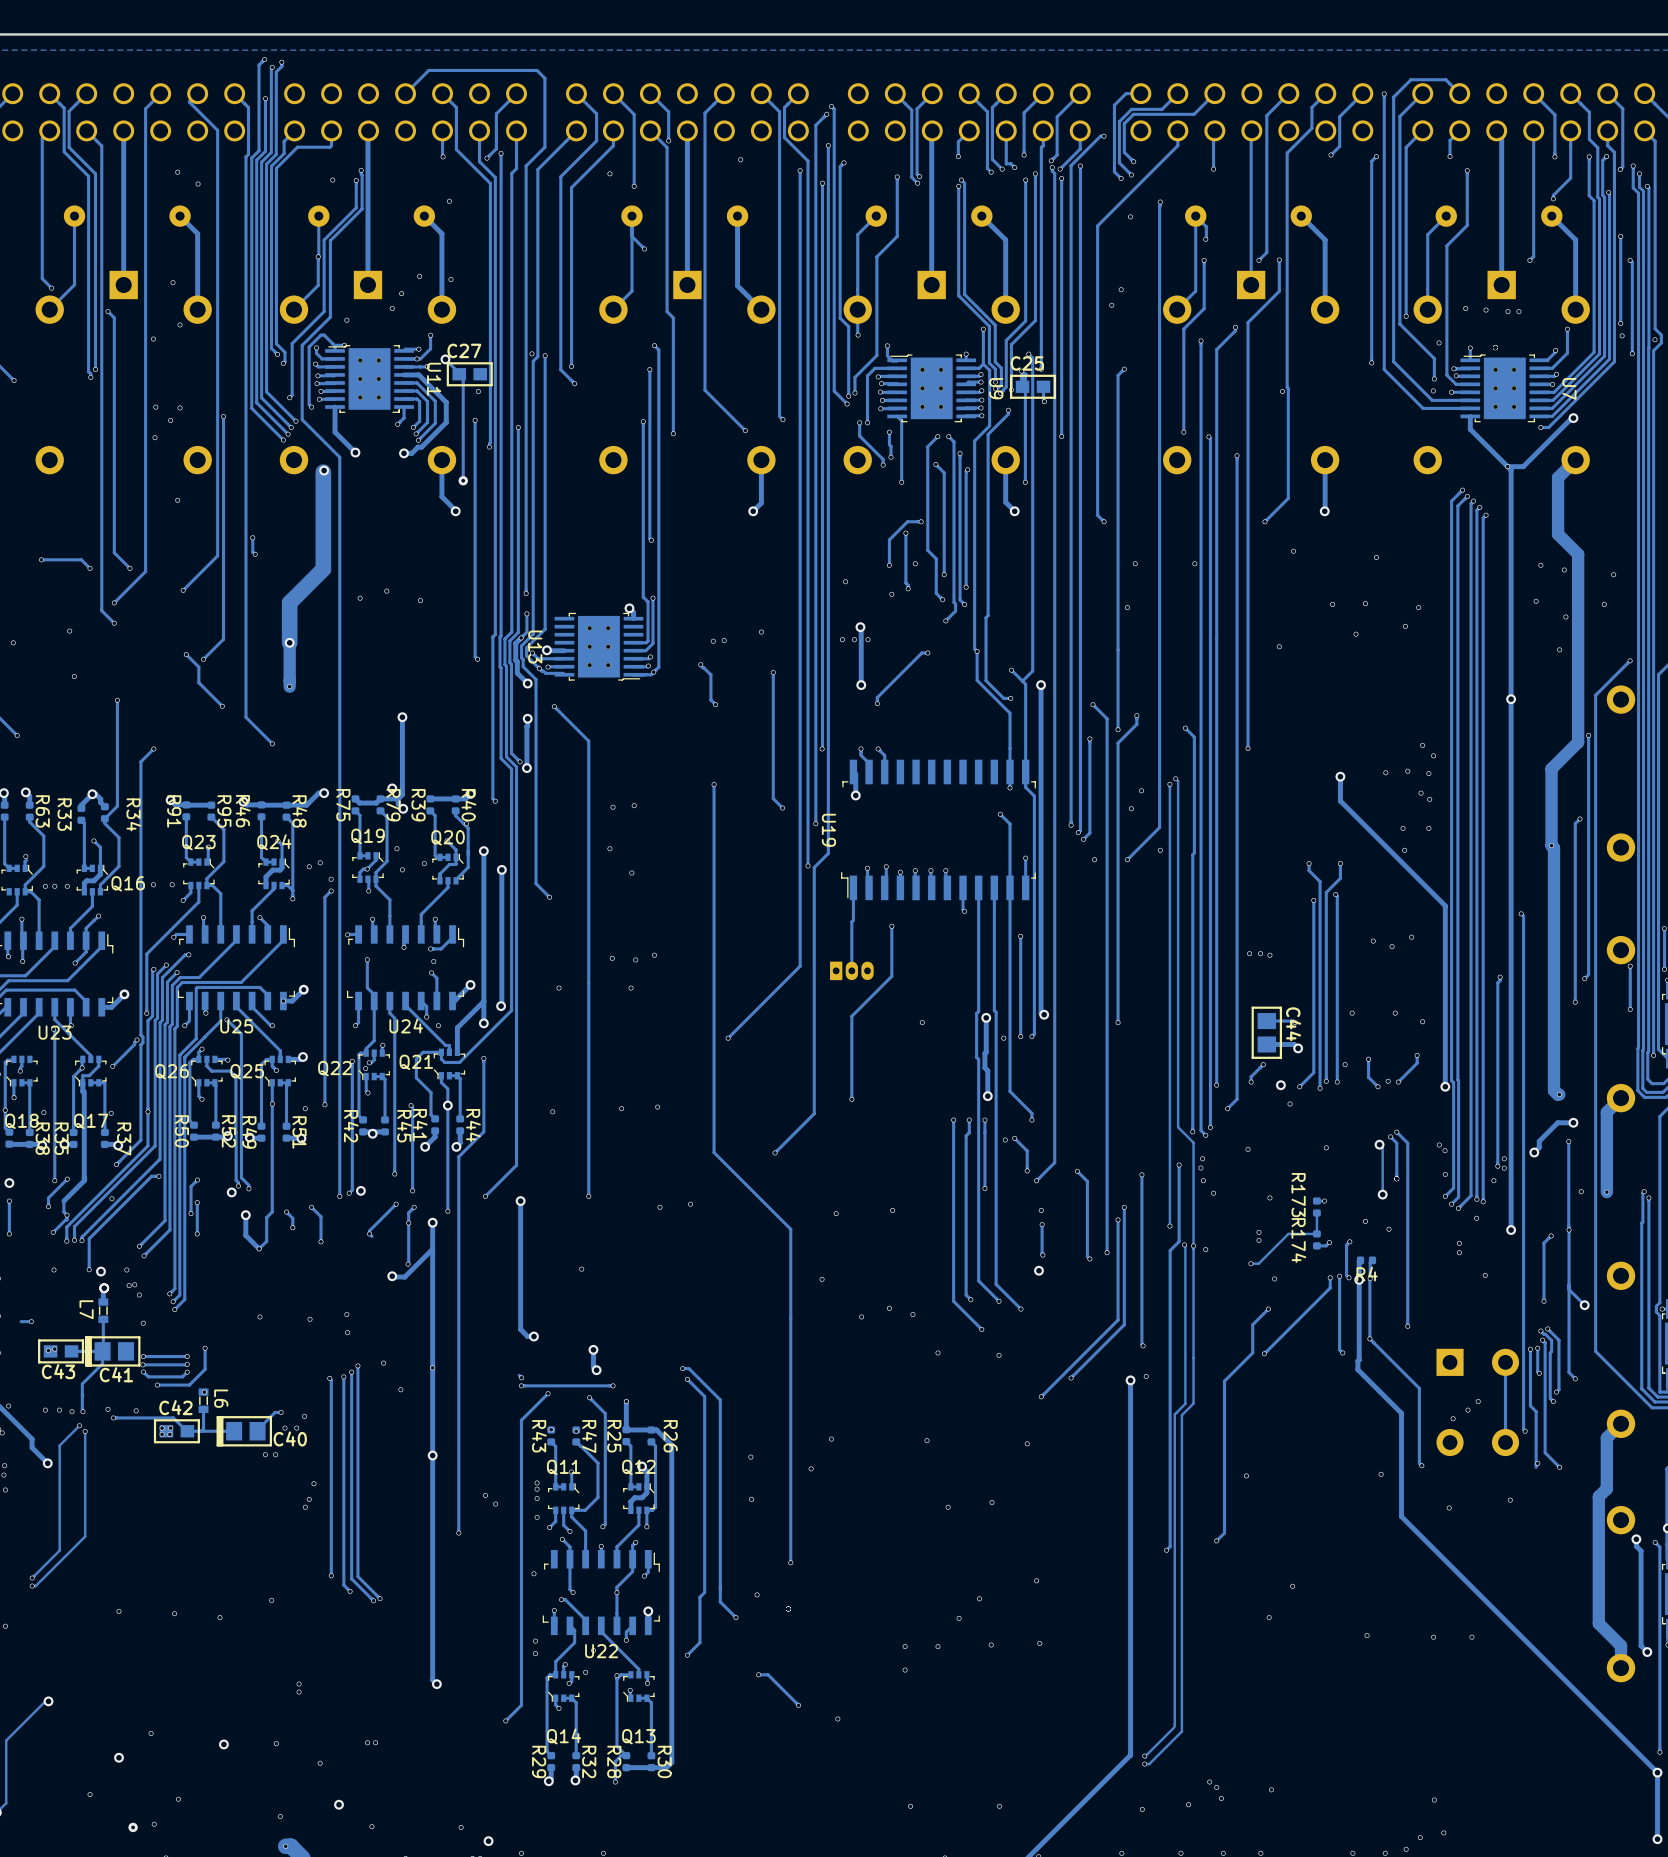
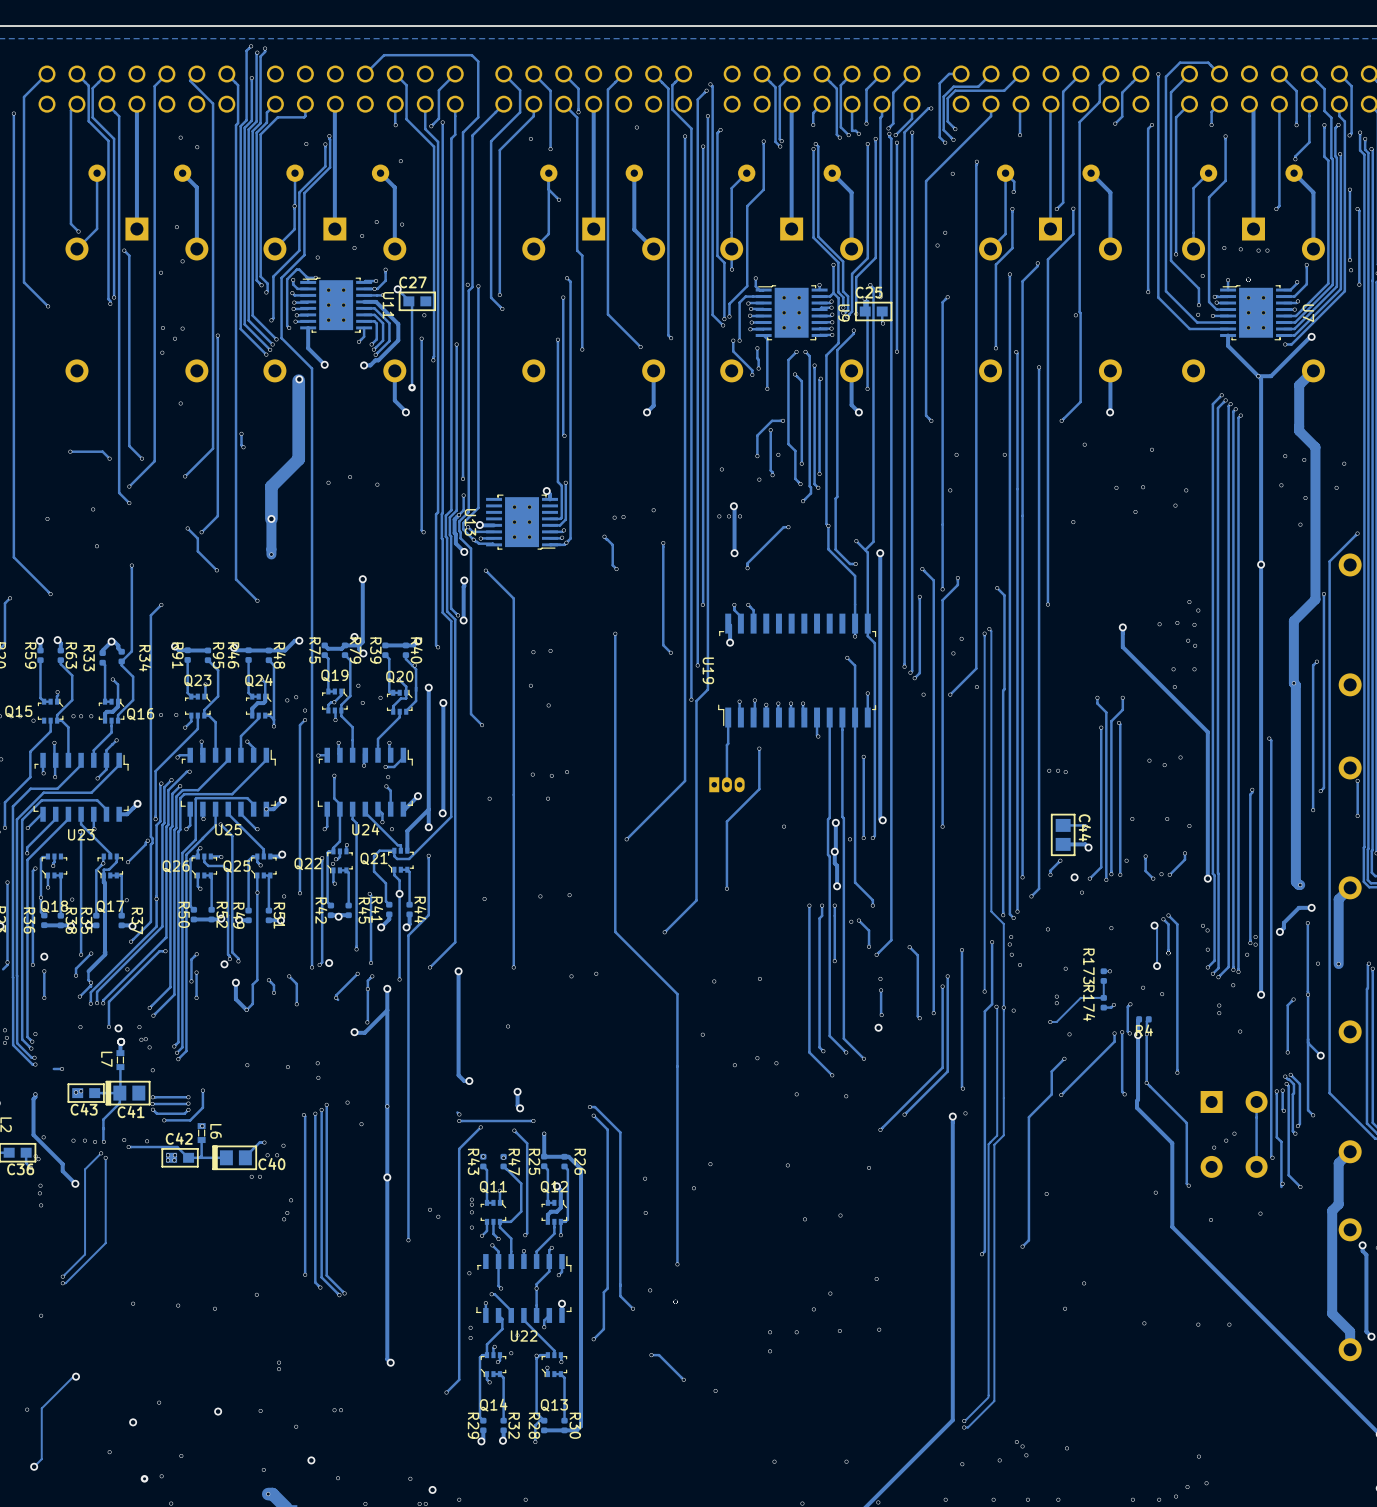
via: none -> (834, 851)

